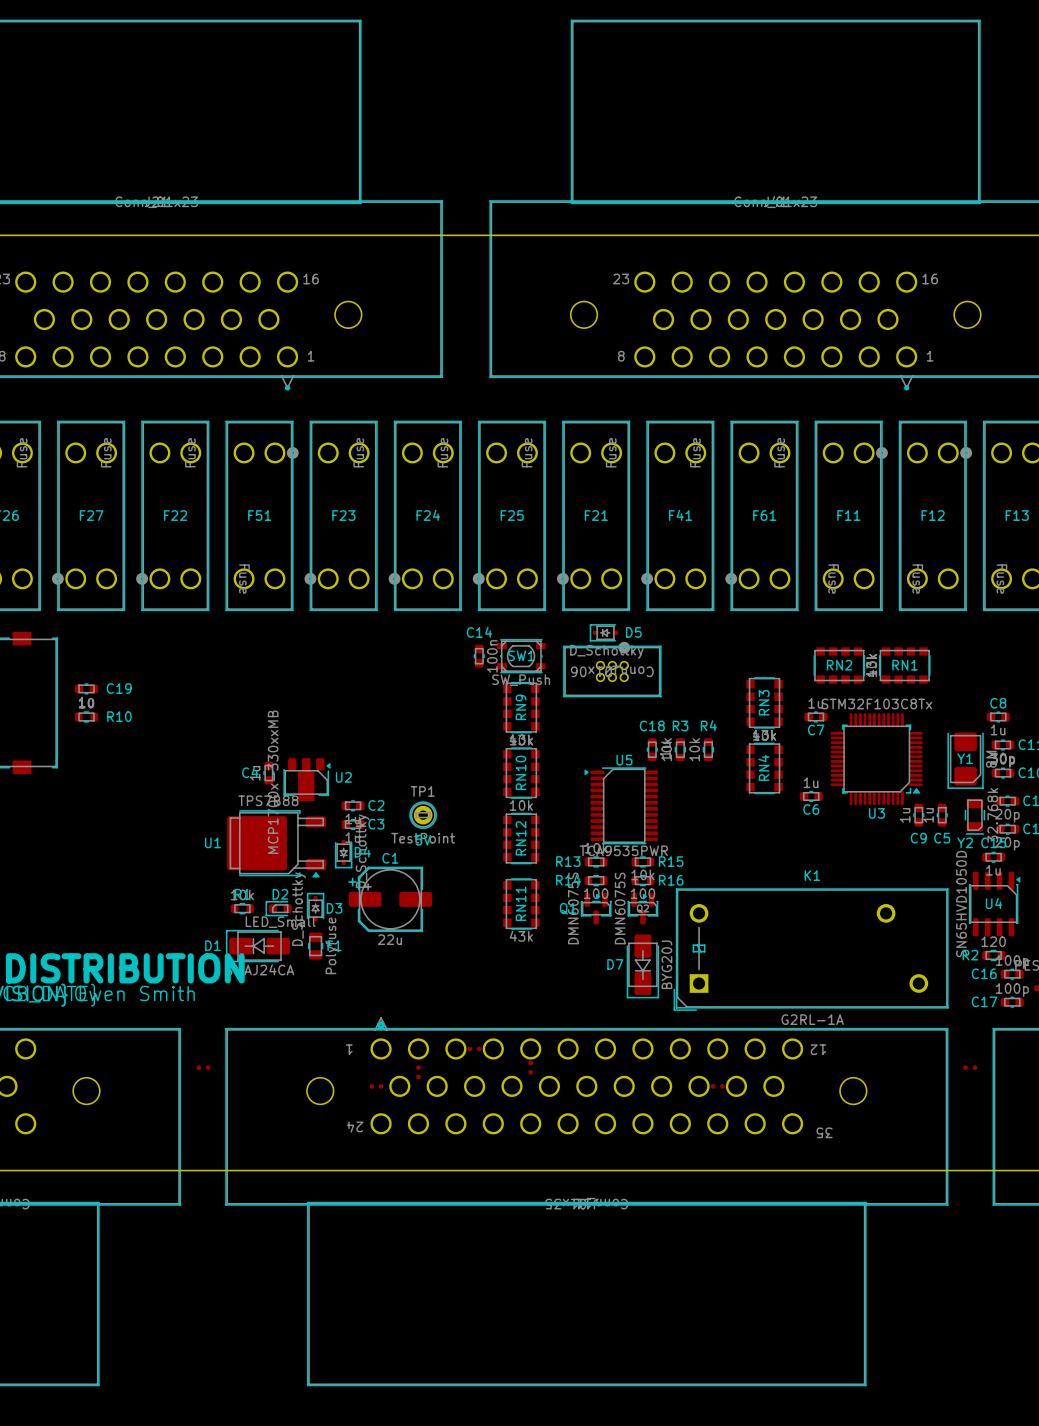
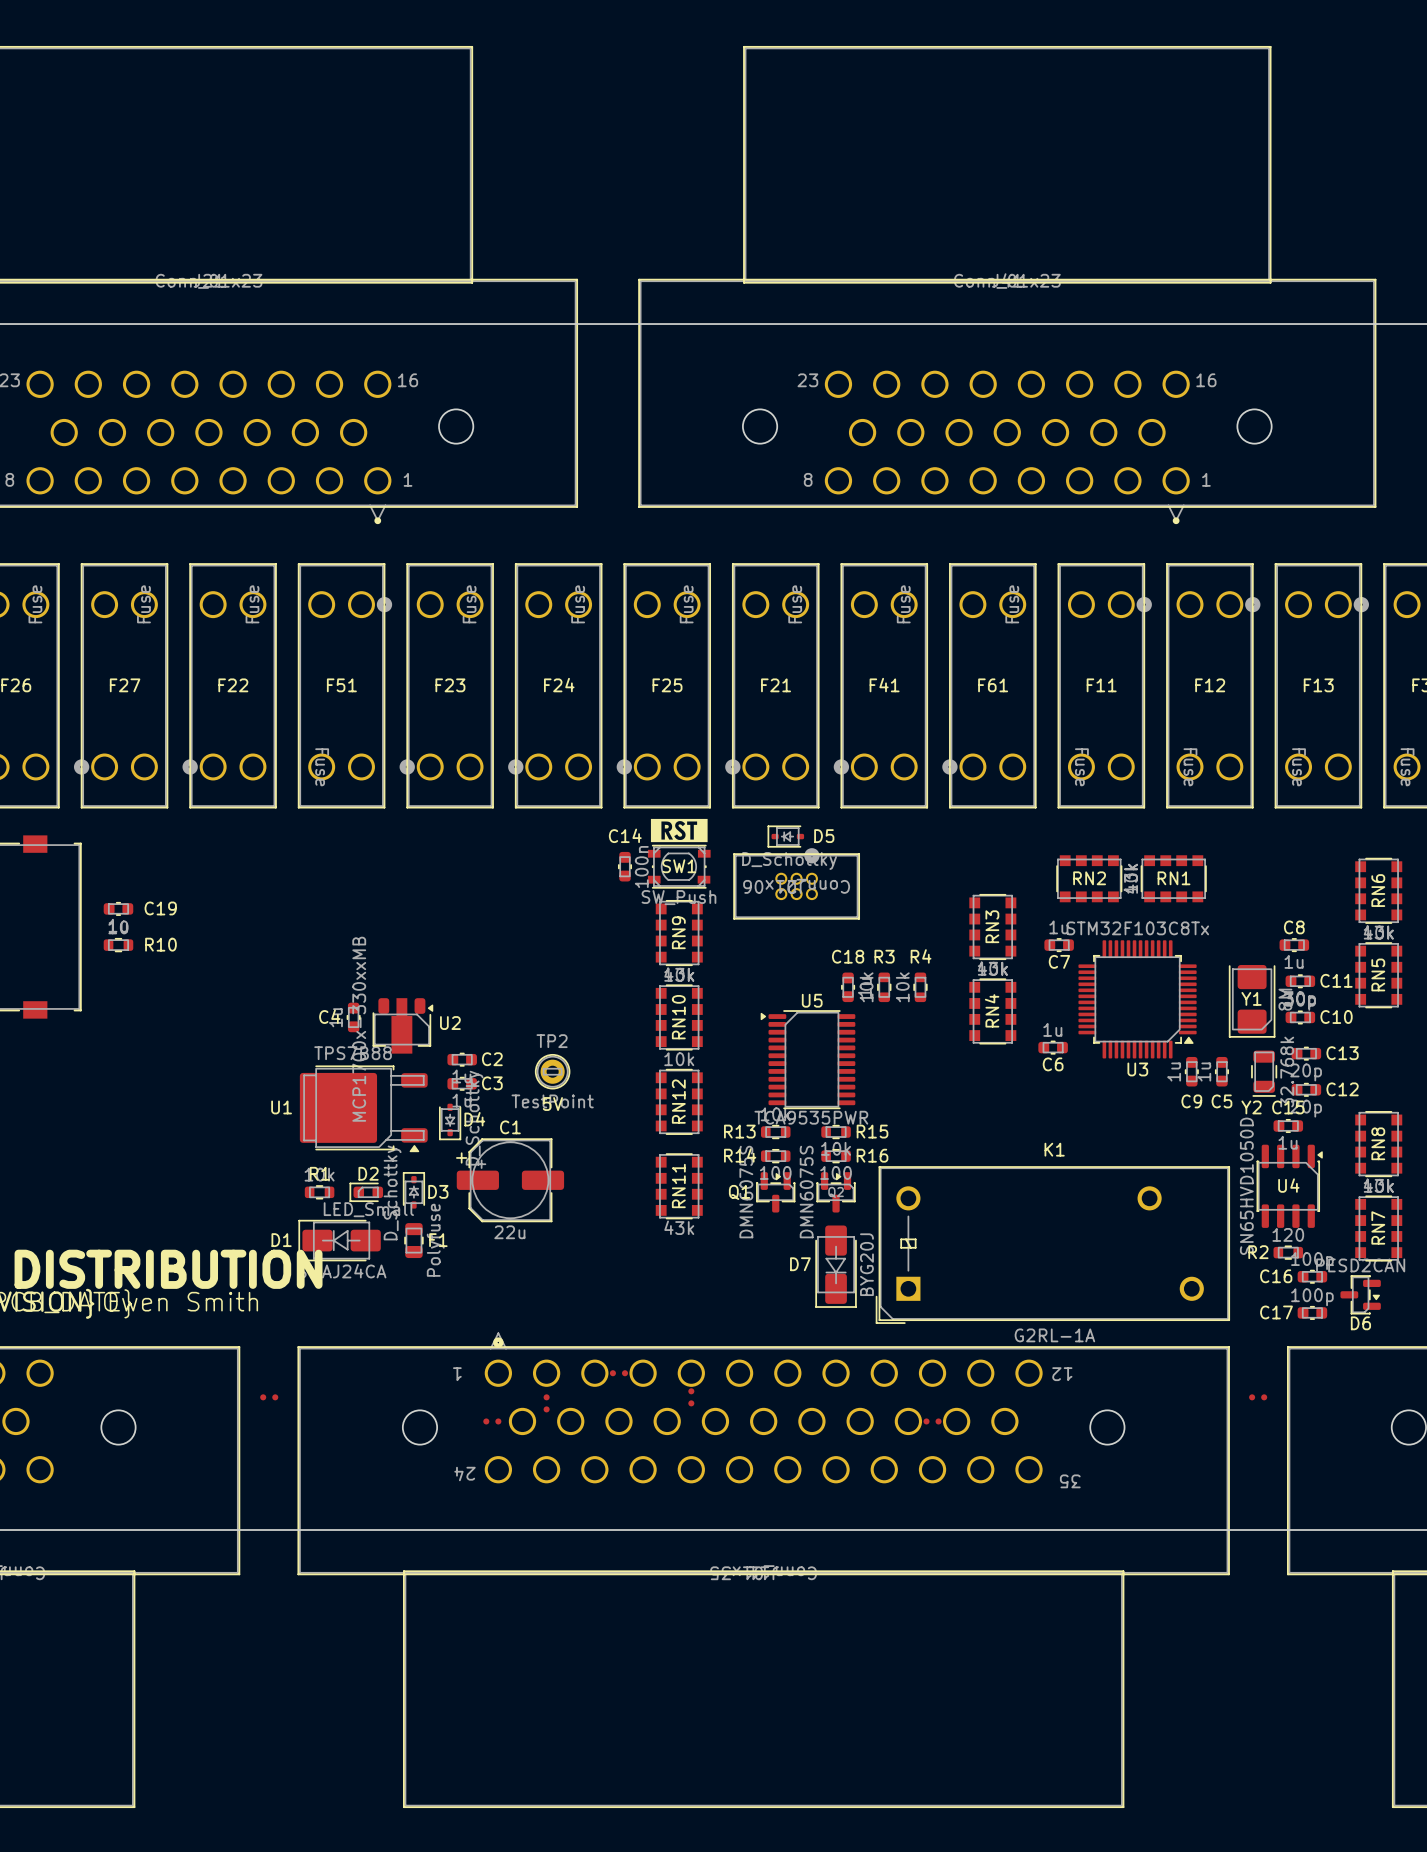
drawing: none -> [650, 818, 708, 843]
TP1 name: TP1 (422, 791) -> TP2 (552, 1041)

